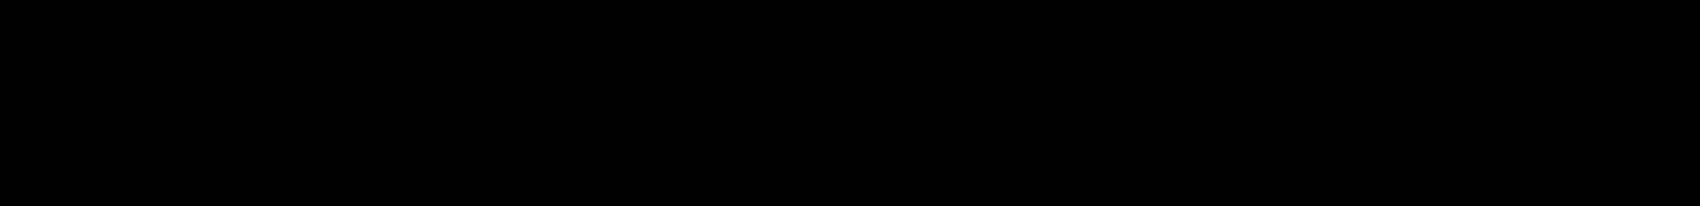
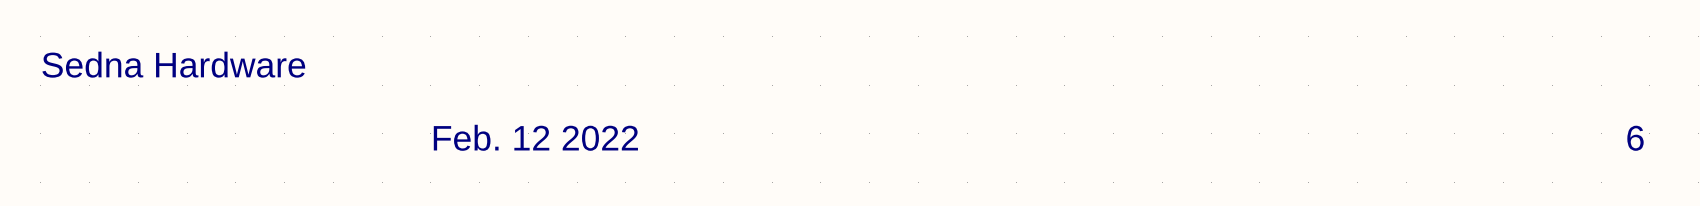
text: none -> Sedna Hardware (173, 64)
text: none -> Feb. 12 2022 (535, 137)
text: none -> 6 (1635, 138)

